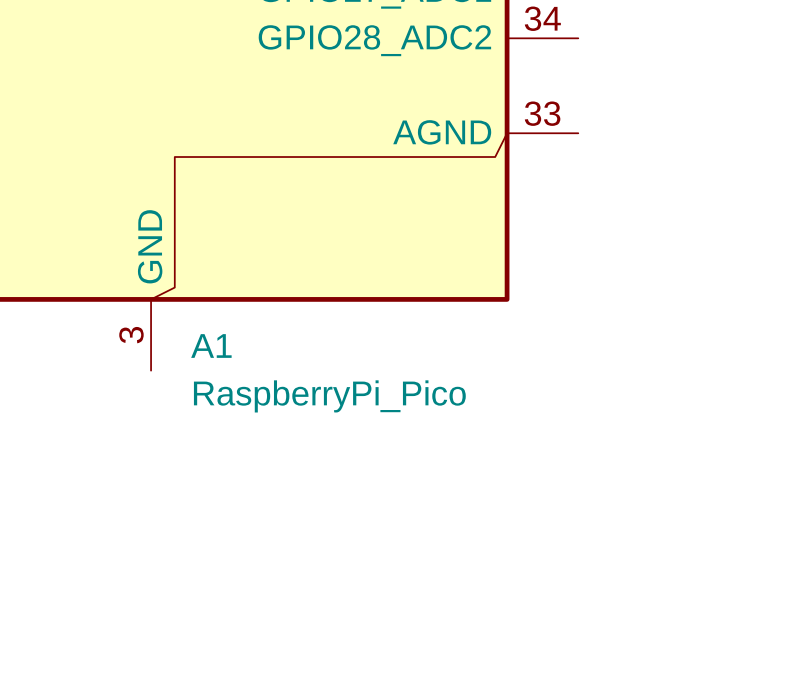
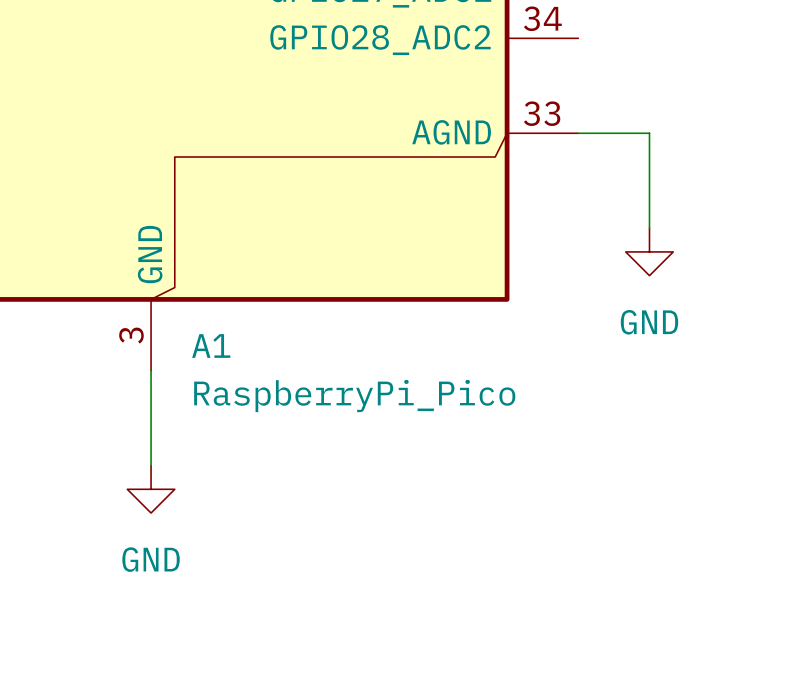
wire: none -> (578, 133) (649, 133) (649, 228)
power symbol: none -> GND (649, 251)
wire: none -> (151, 370) (151, 465)
power symbol: none -> GND (151, 489)

